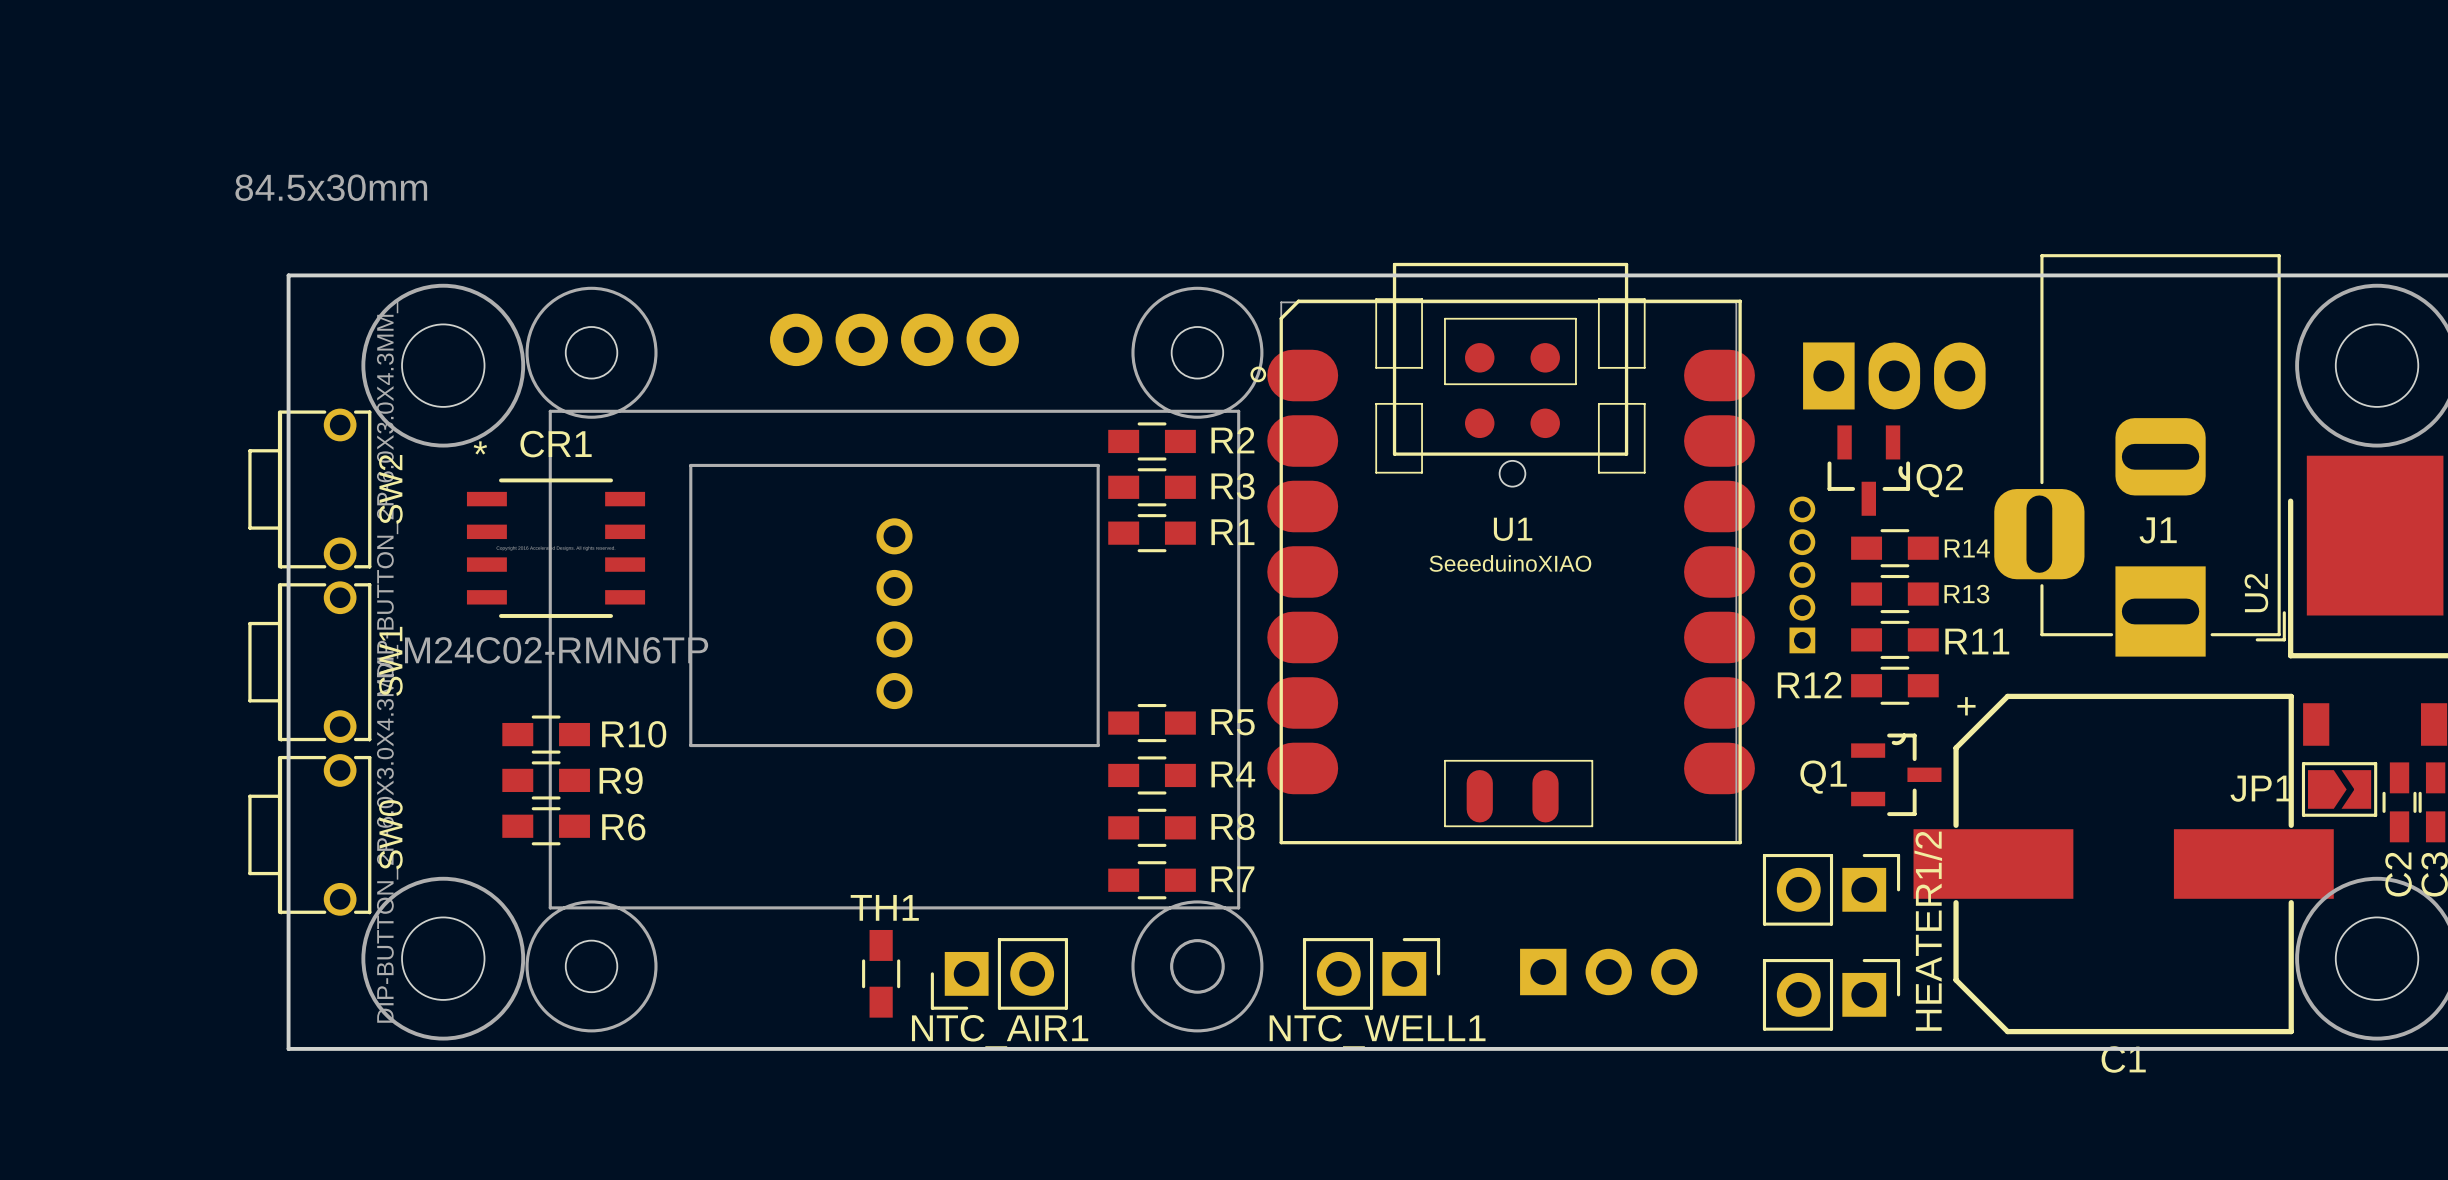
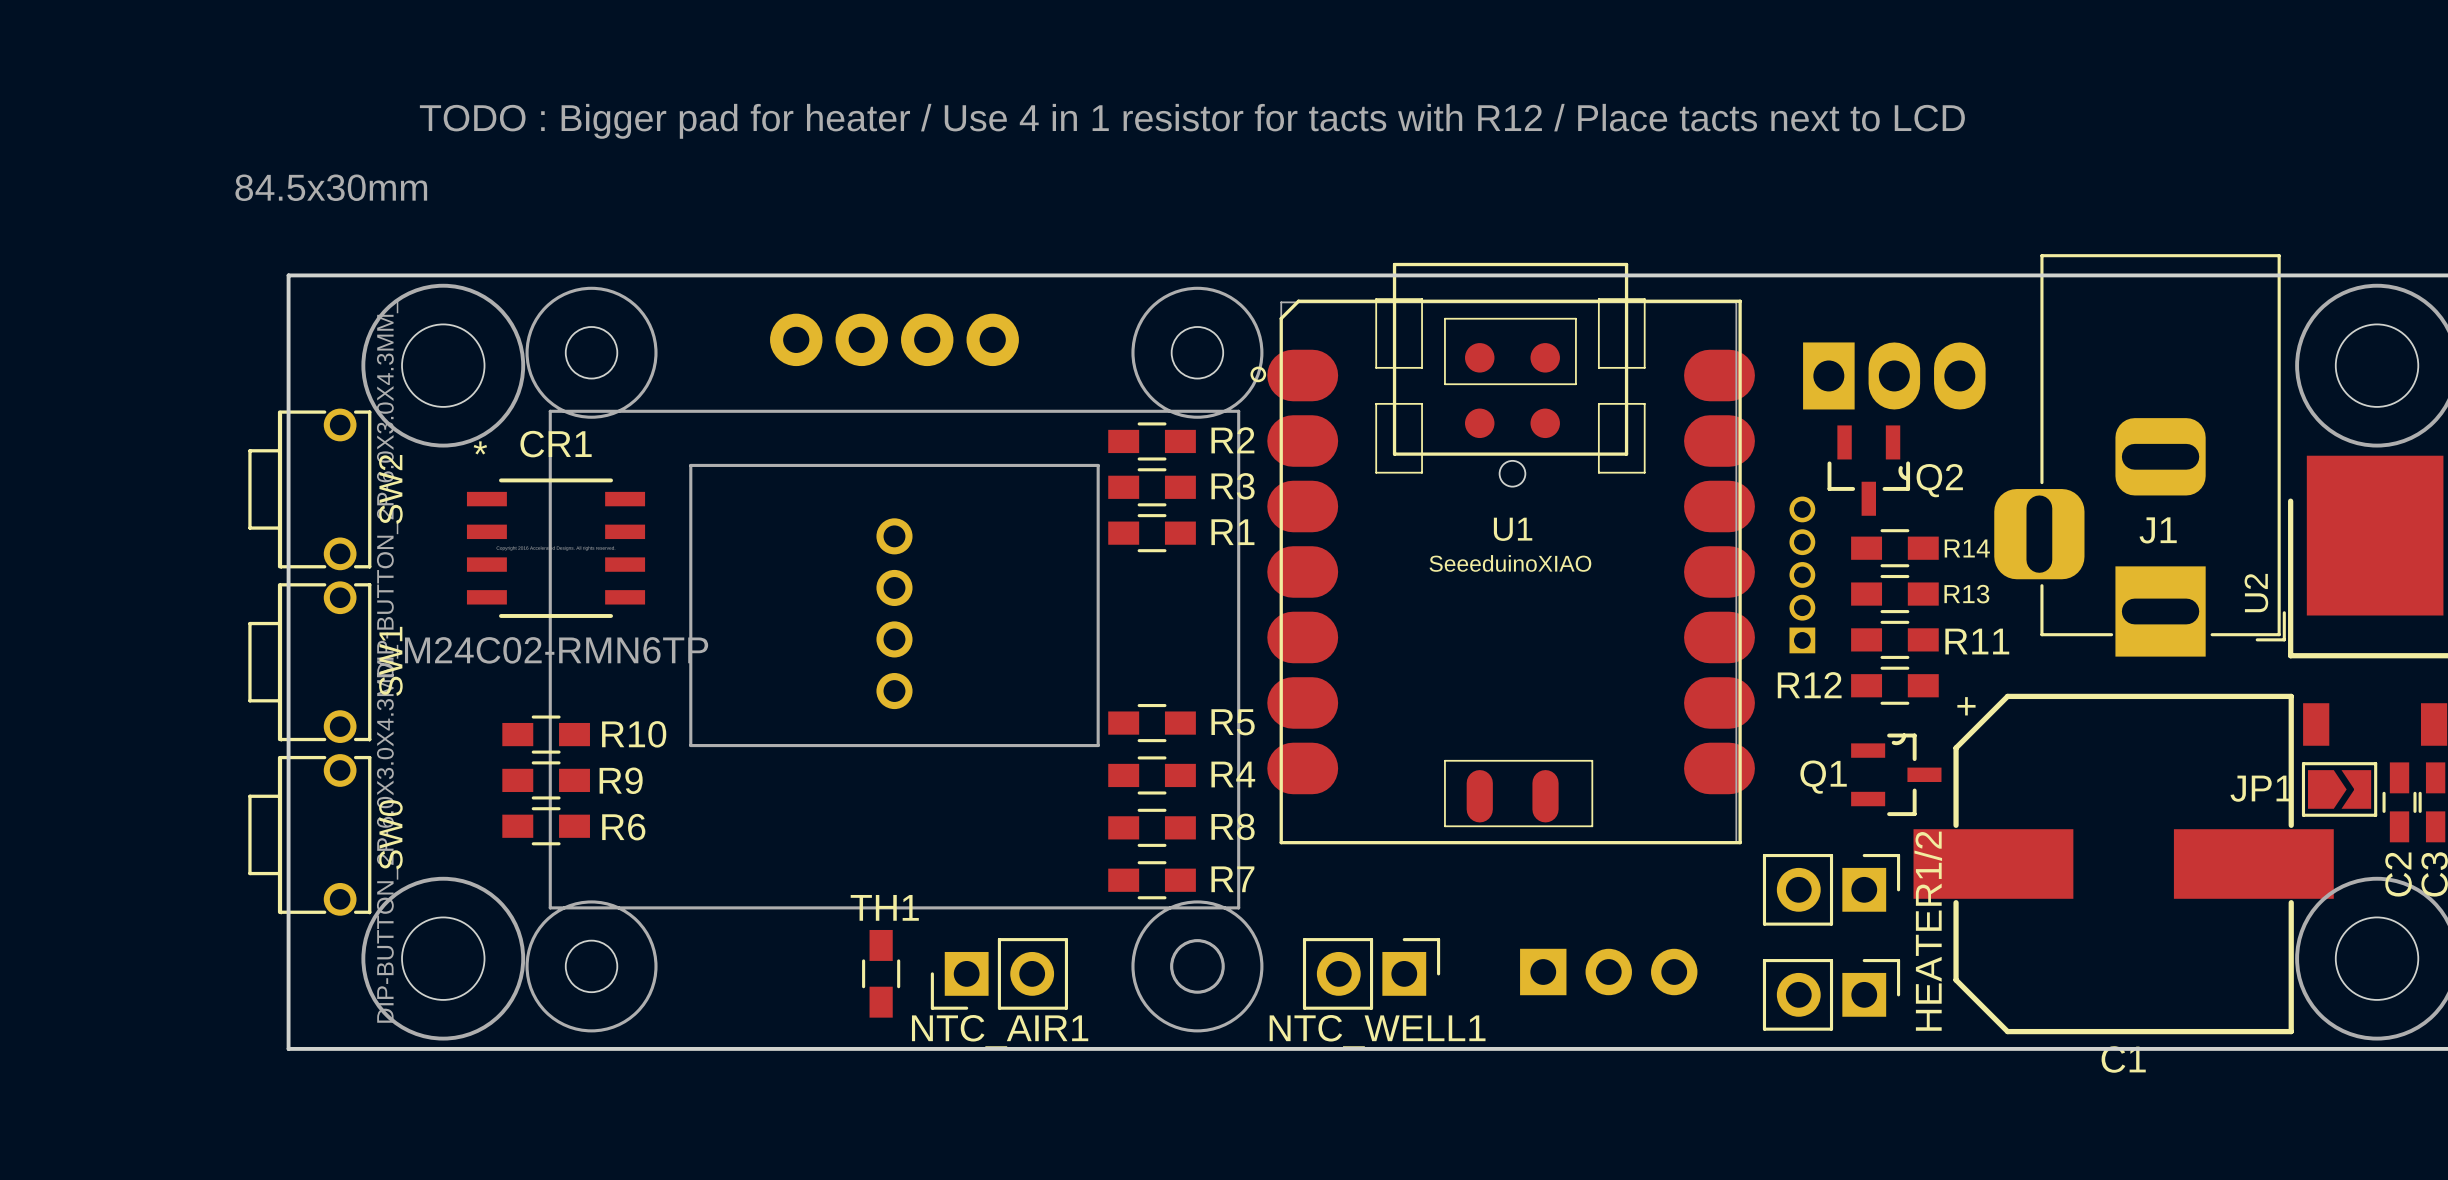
text: none -> TODO : Bigger pad for heater / Use 4 in 1 resistor for tacts with R12 / Place tacts next to LCD (1192, 121)

